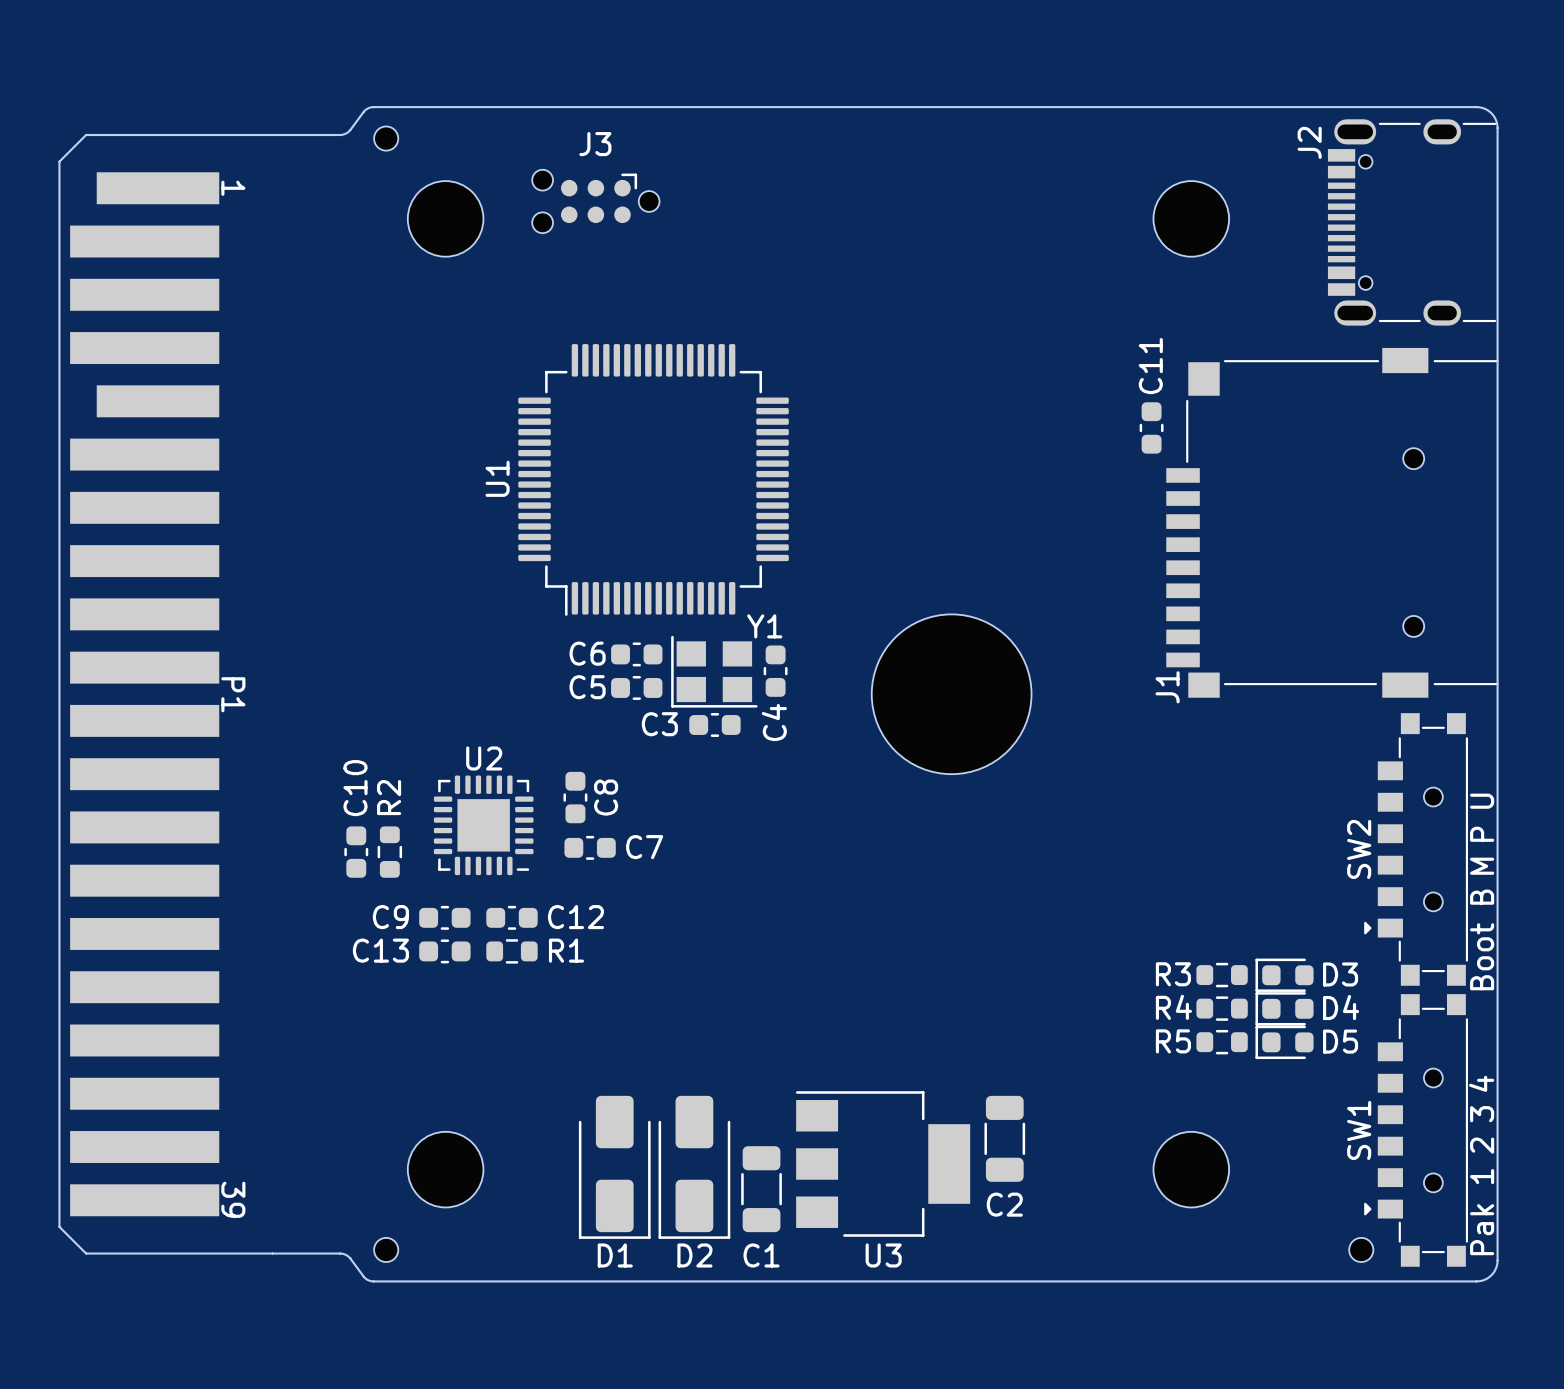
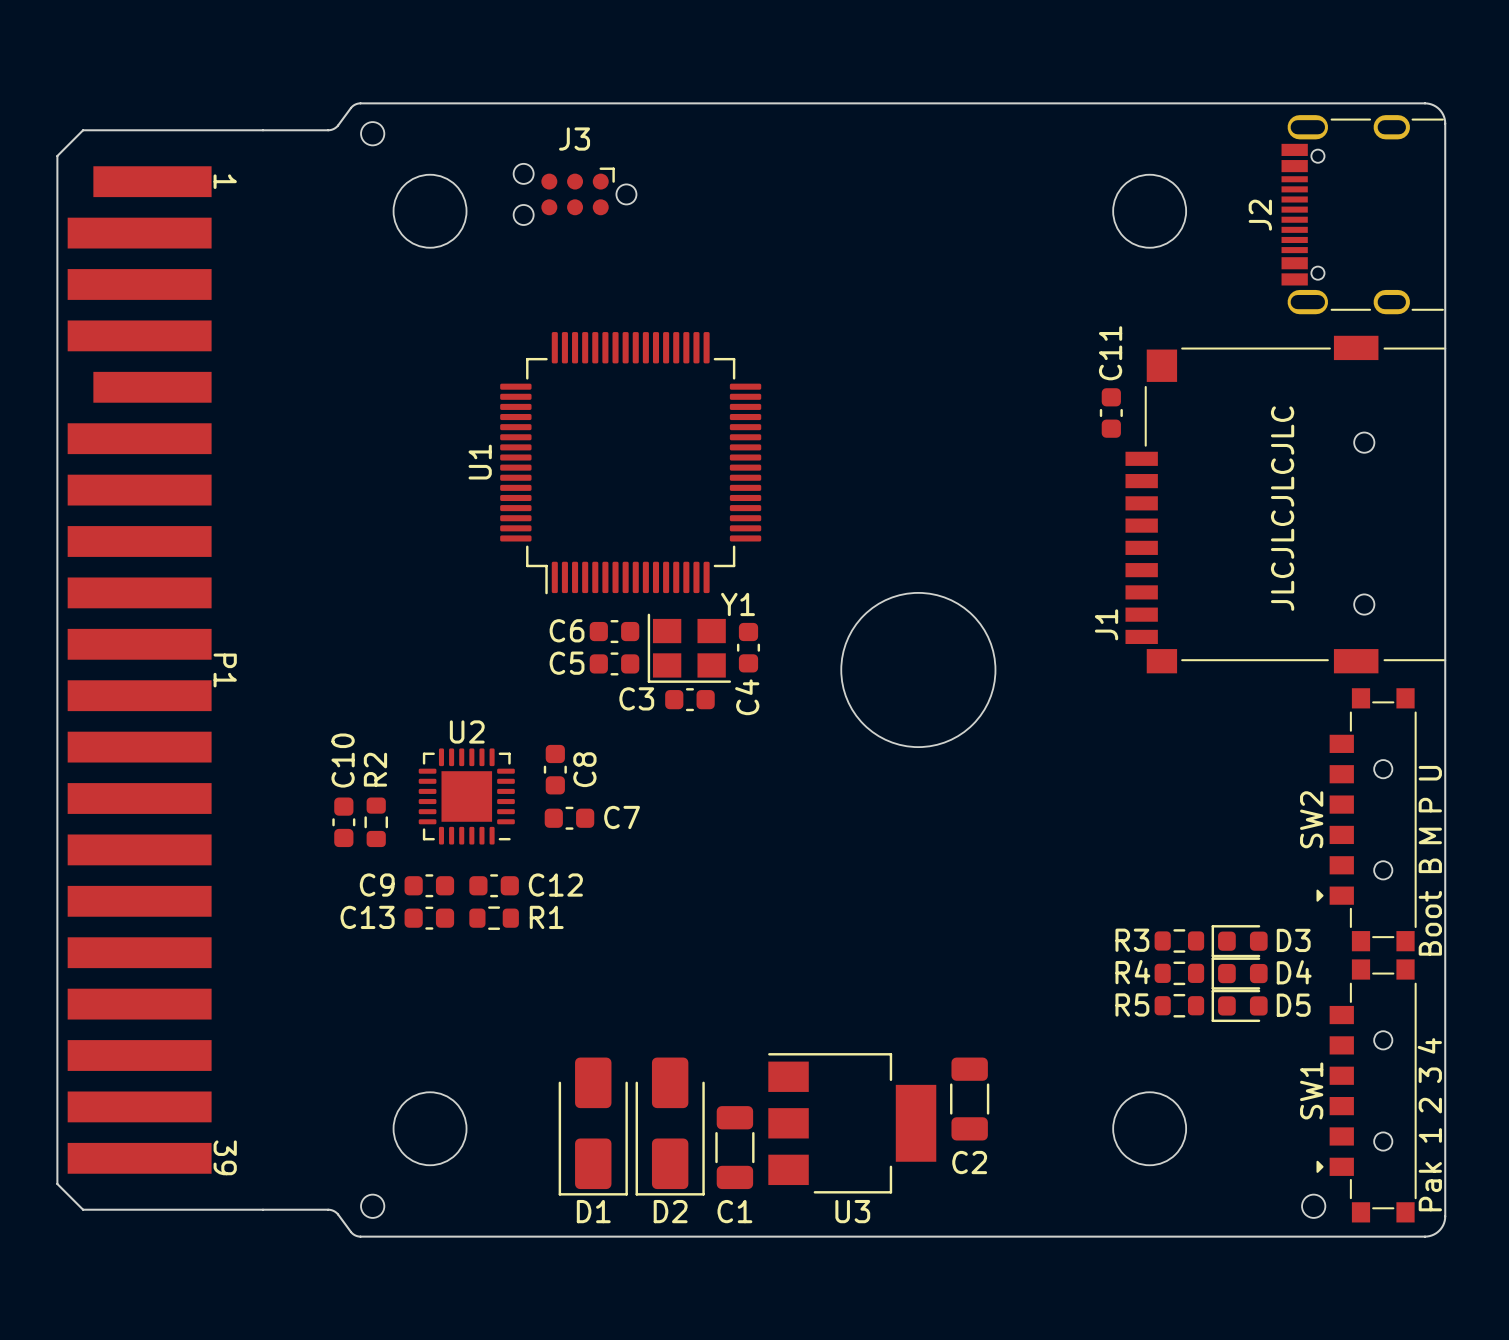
J2 name position: J2 (1309, 142) -> J2 (1260, 215)
text: none -> JLCJLCJLCJLC (1282, 508)
J1 name position: J1 (1167, 687) -> J1 (1106, 624)

